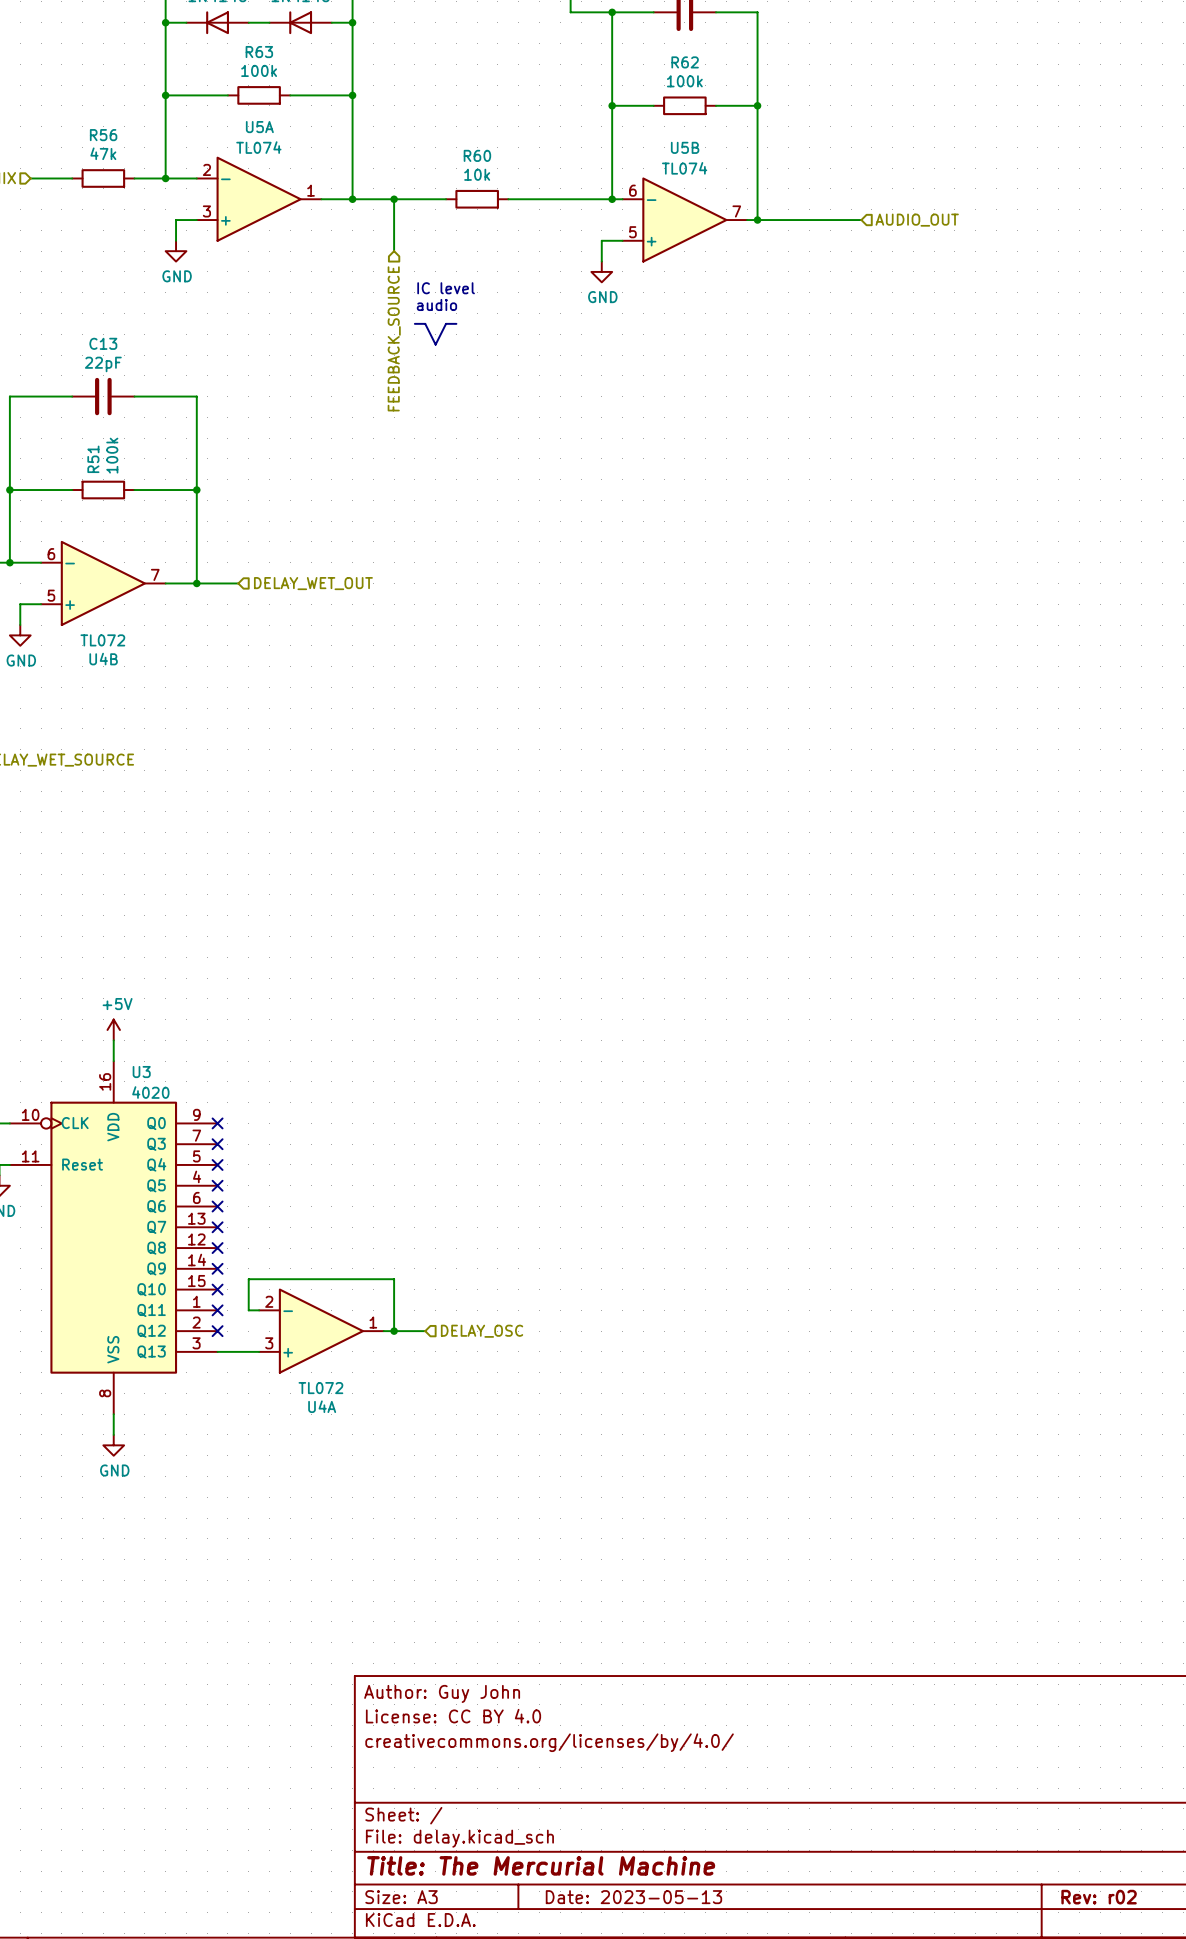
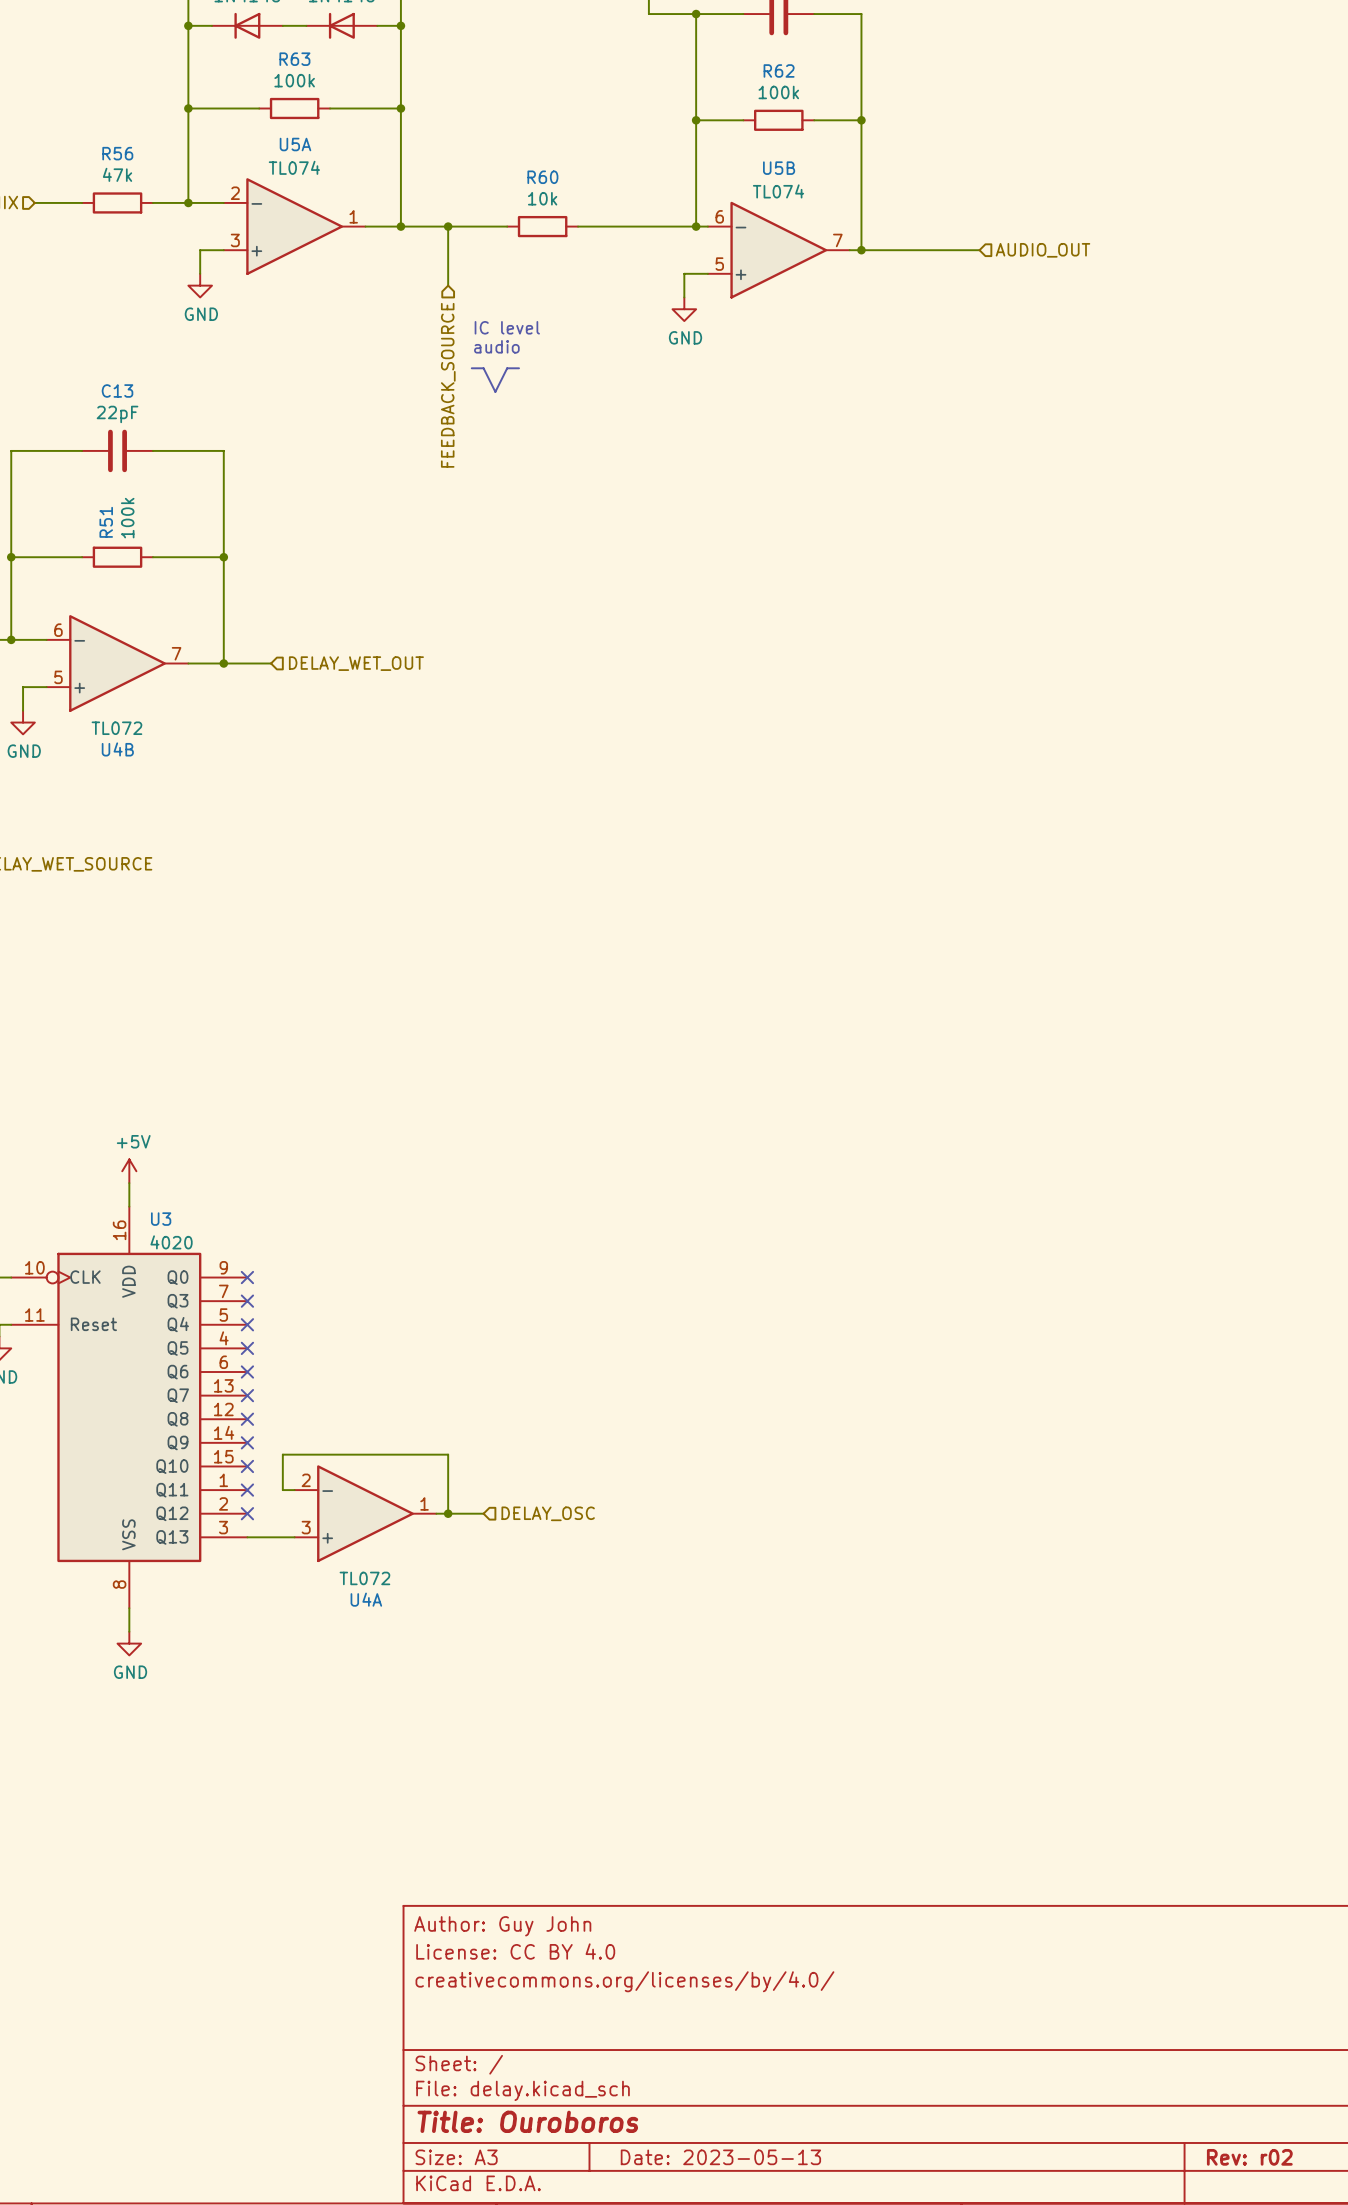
title block: Title: The Mercurial Machine (541, 1865) -> Title: Ouroboros (527, 2121)

